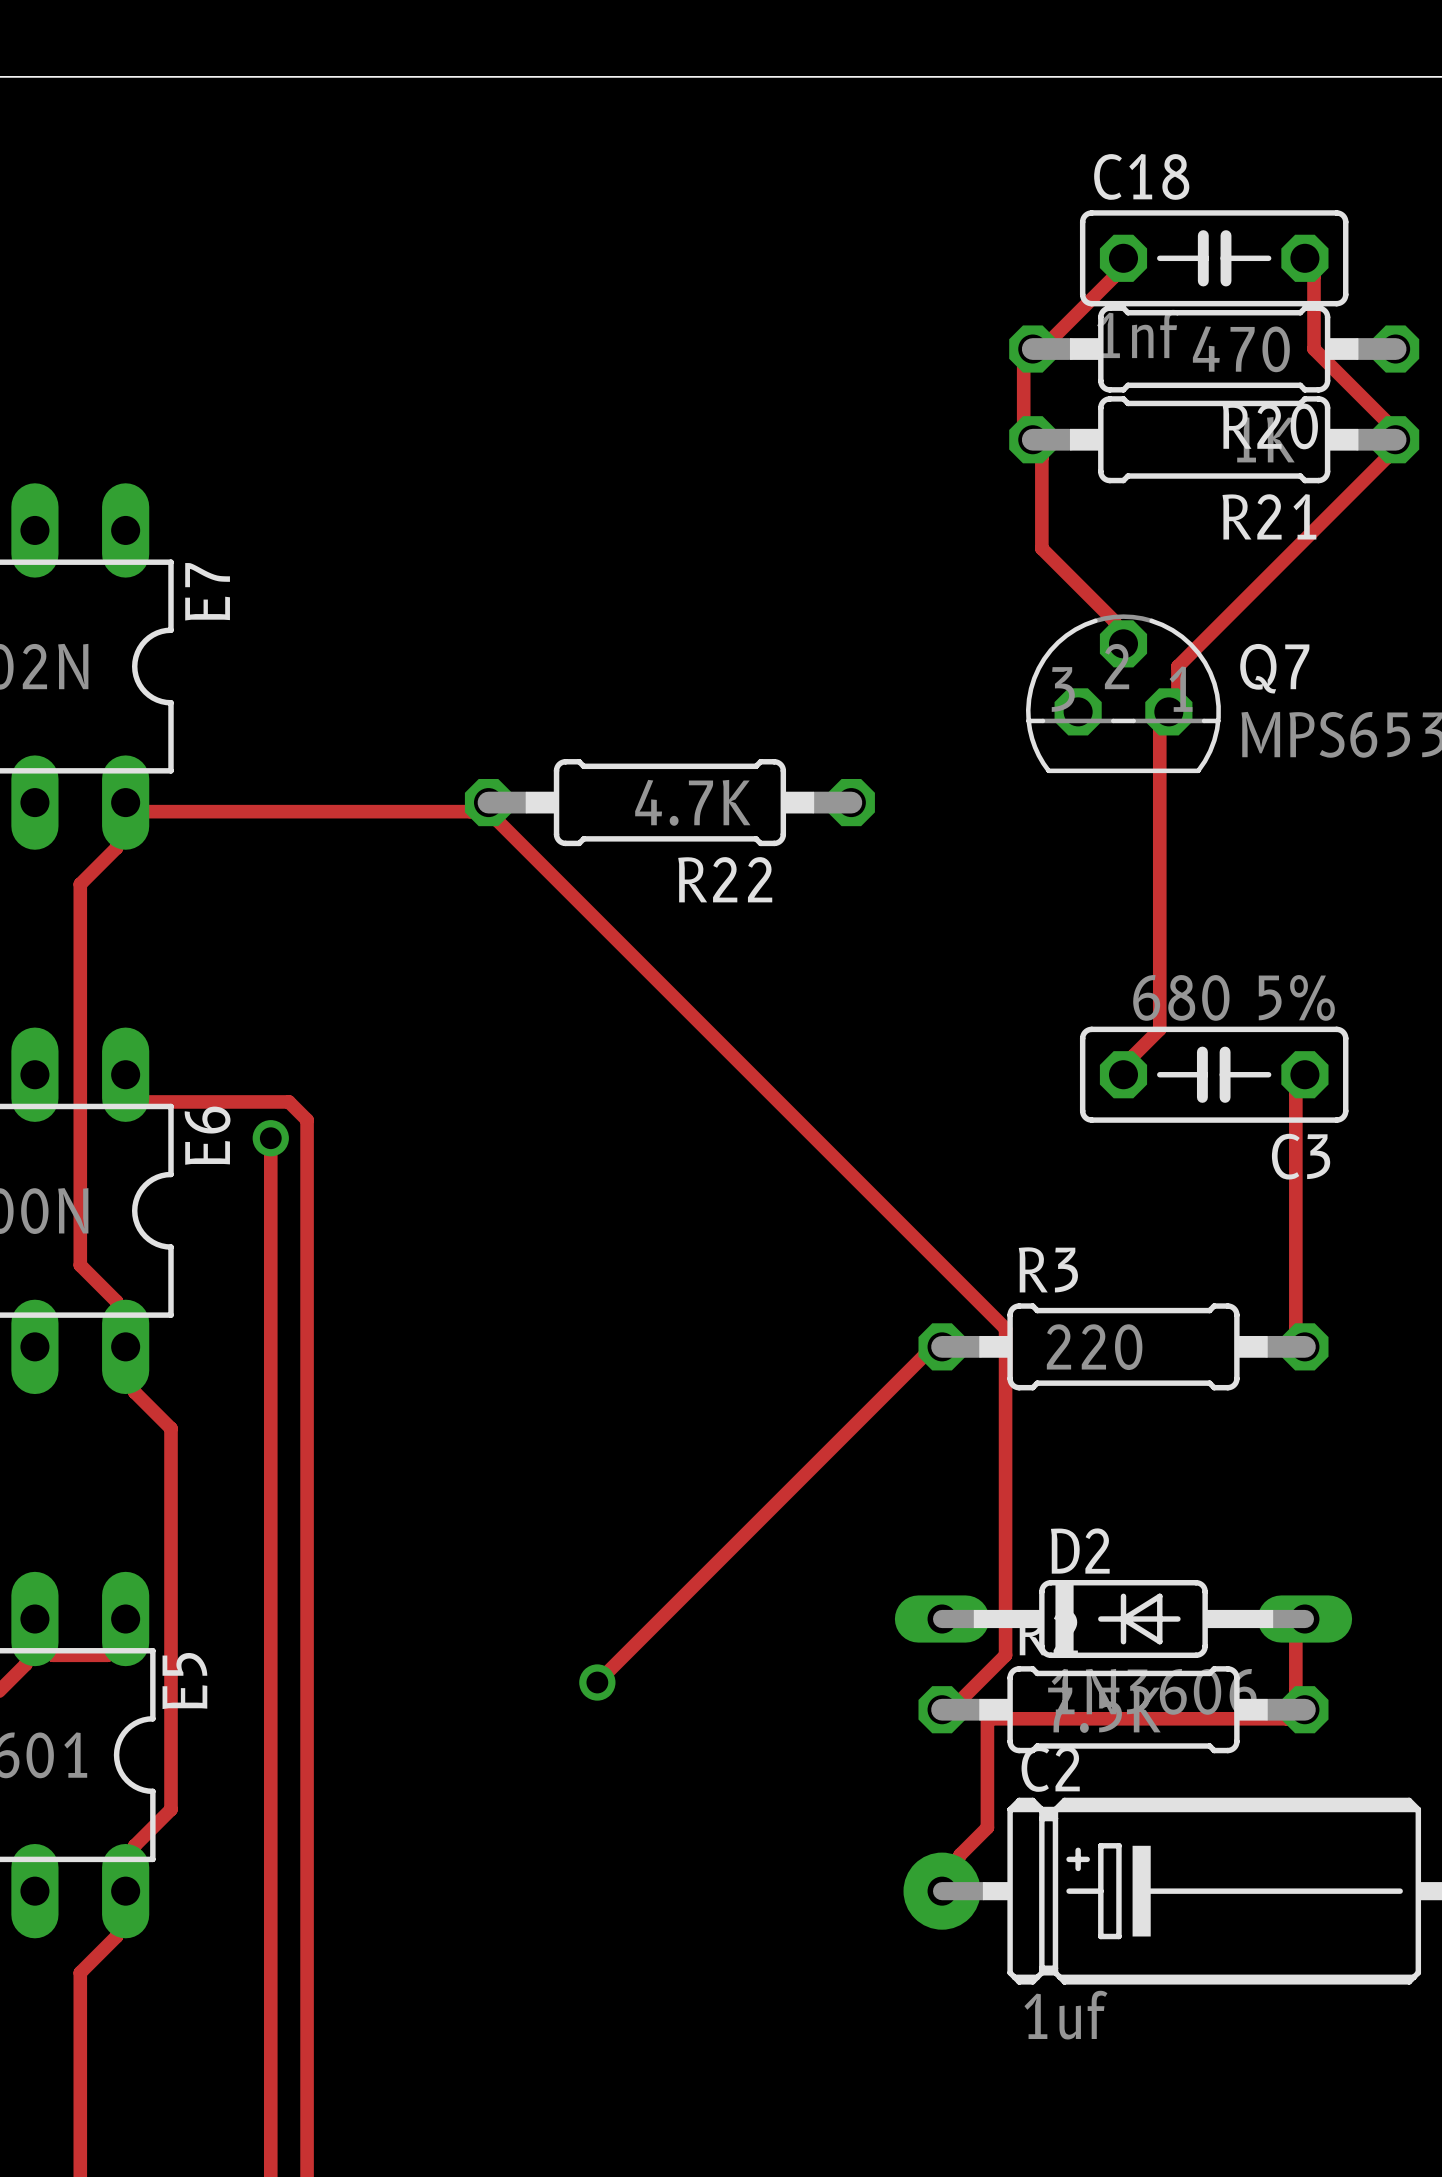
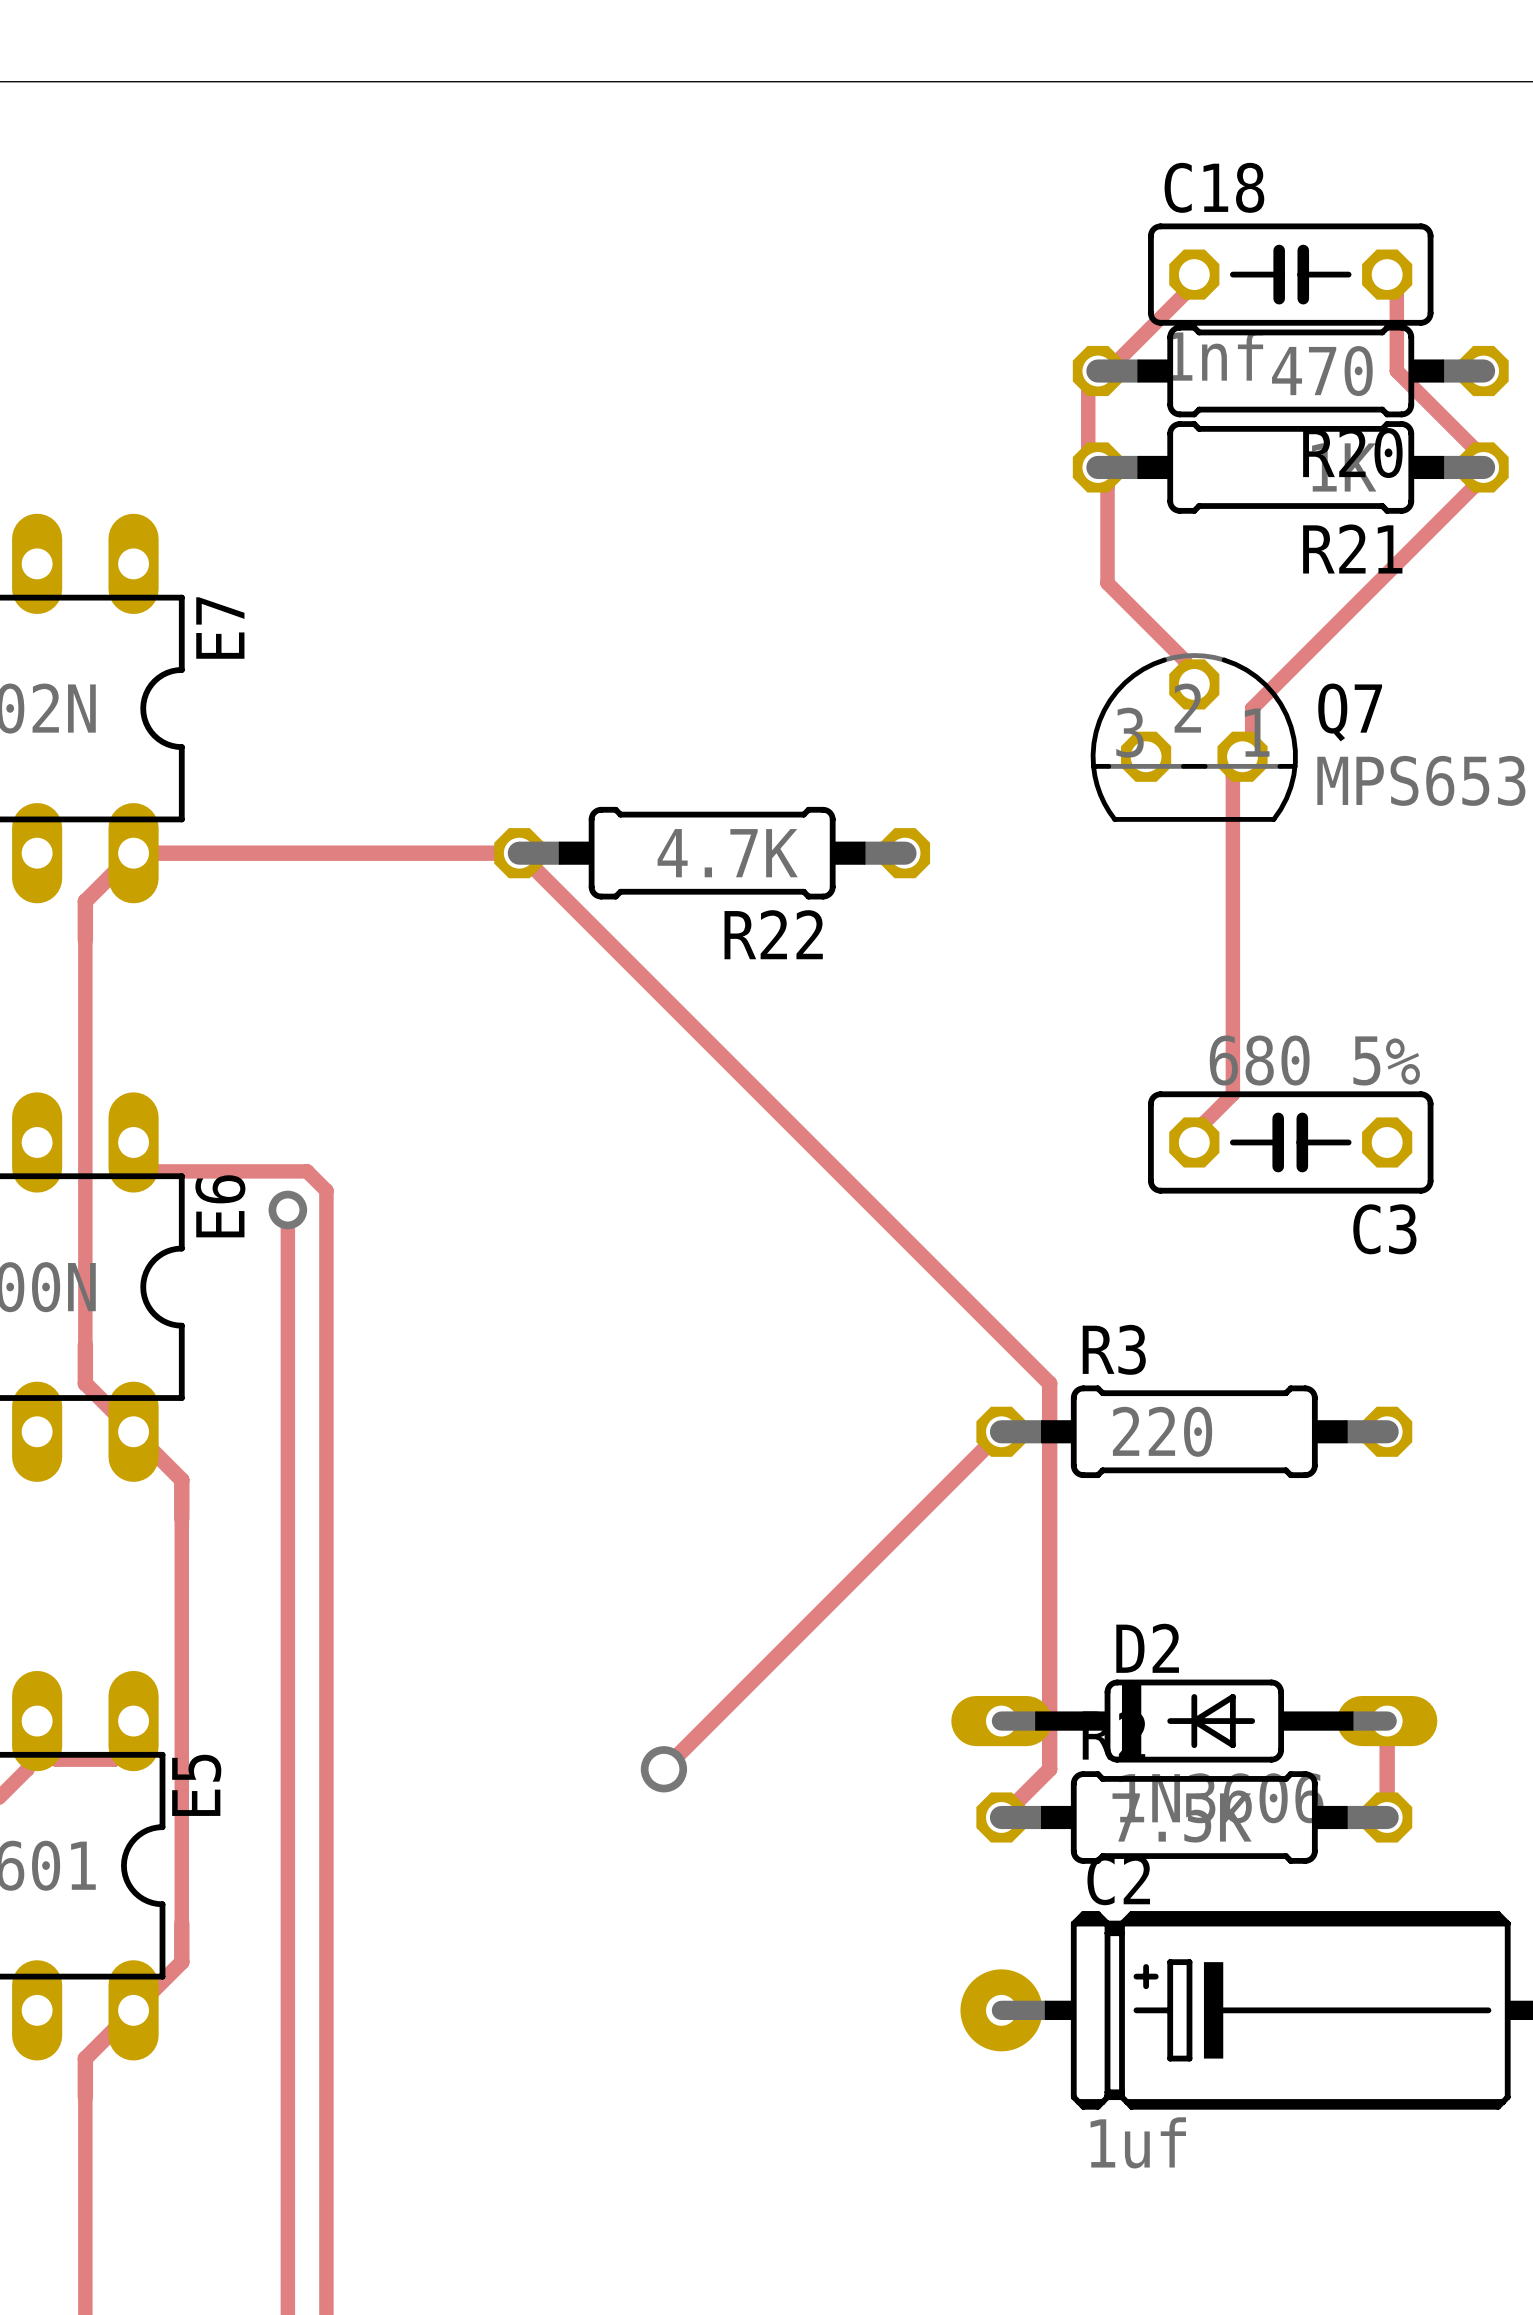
track: (80, 884) (116, 847) (125, 802) (143, 811) (470, 811) (488, 802) (497, 820) (1005, 1328) (1005, 1655) (960, 1700) (942, 1709) -> (85, 939) (85, 901) (133, 853) (519, 853) (1049, 1383) (1049, 1769) (1001, 1817)
track: (1304, 1074) (1295, 1092) (1295, 1328) (1304, 1346) -> none
track: (80, 1265) (116, 1301) (134, 1392) (171, 1428) -> (85, 1344) (85, 1383) (181, 1479) (181, 1518)
track: (942, 1346) (923, 1355) (597, 1682) -> (1001, 1431) (663, 1769)
track: (1304, 1619) (1295, 1637) (1295, 1691) (1304, 1709) (1286, 1718) (987, 1718) (987, 1827) (960, 1854) (942, 1891) -> (1387, 1721) (1387, 1817)
via position: (597, 1682) -> (663, 1769)
track: (171, 1809) (134, 1845) (116, 1936) (80, 1972) -> (181, 1923) (181, 1962) (85, 2058) (85, 2097)

